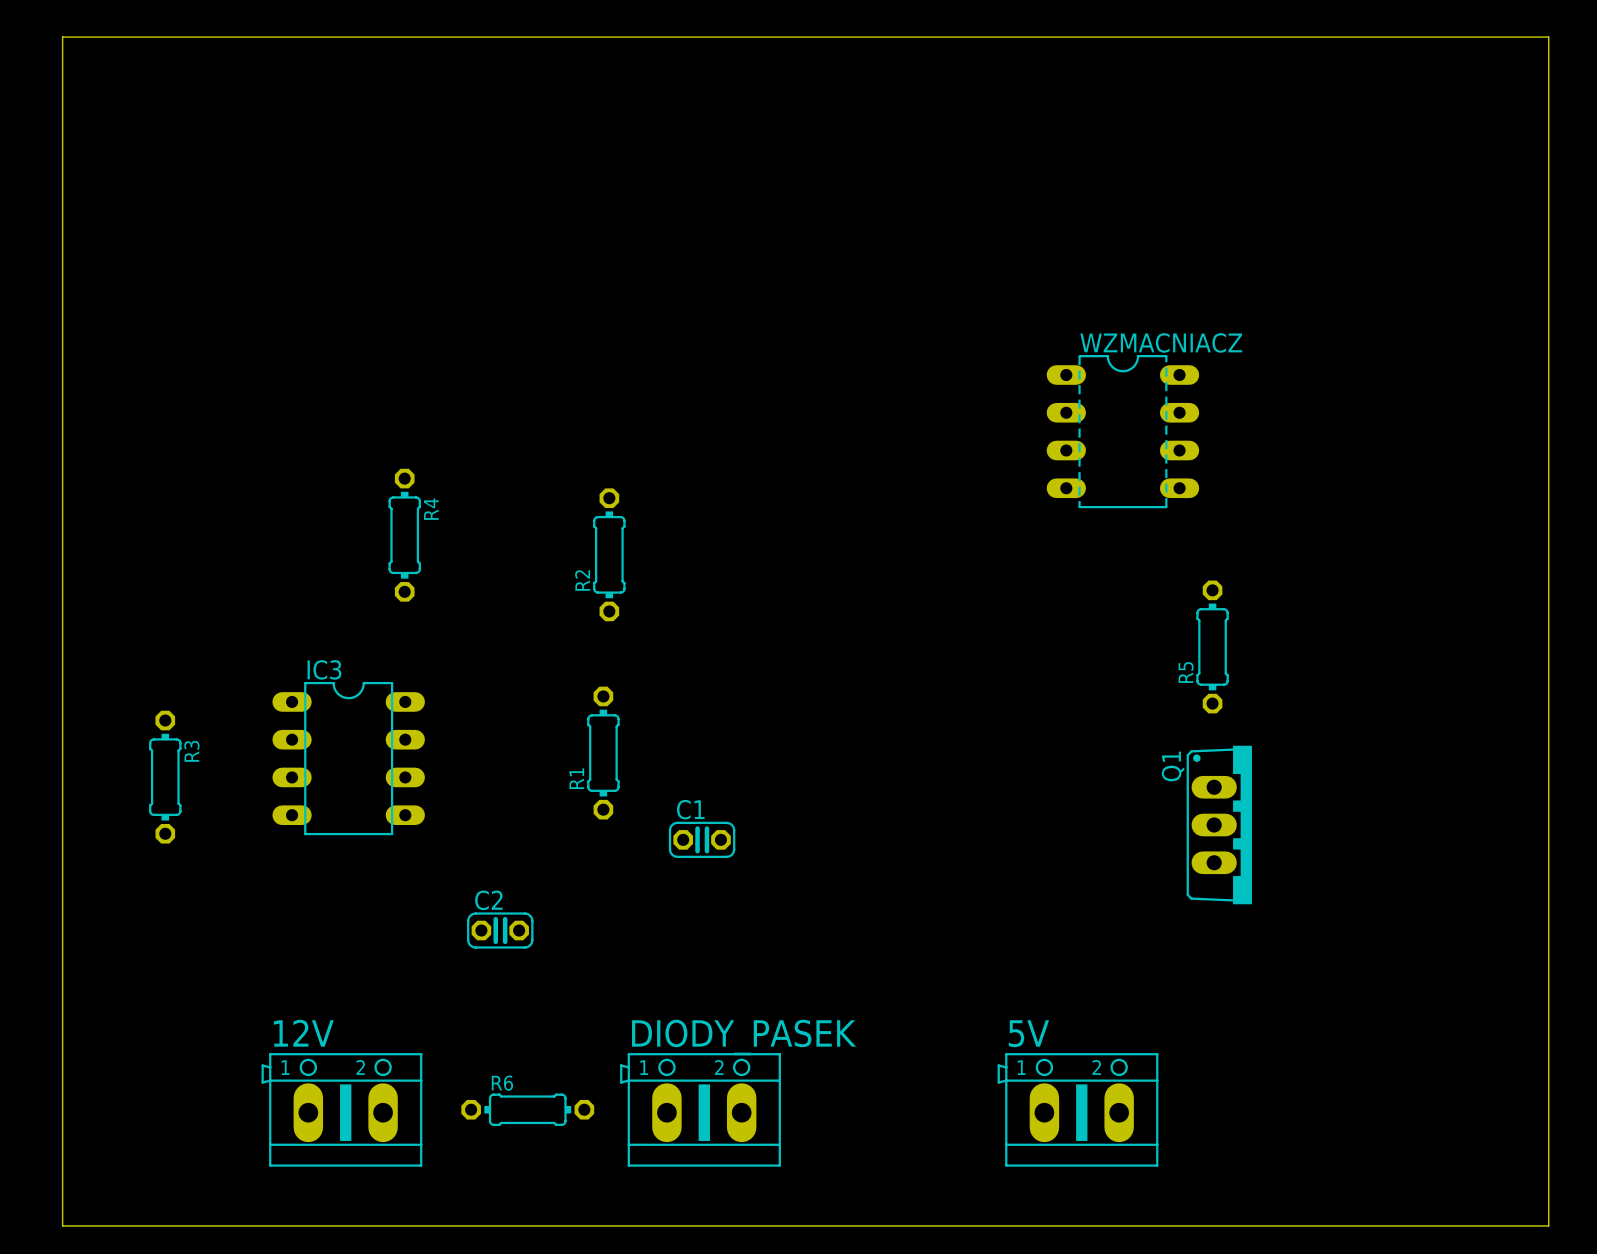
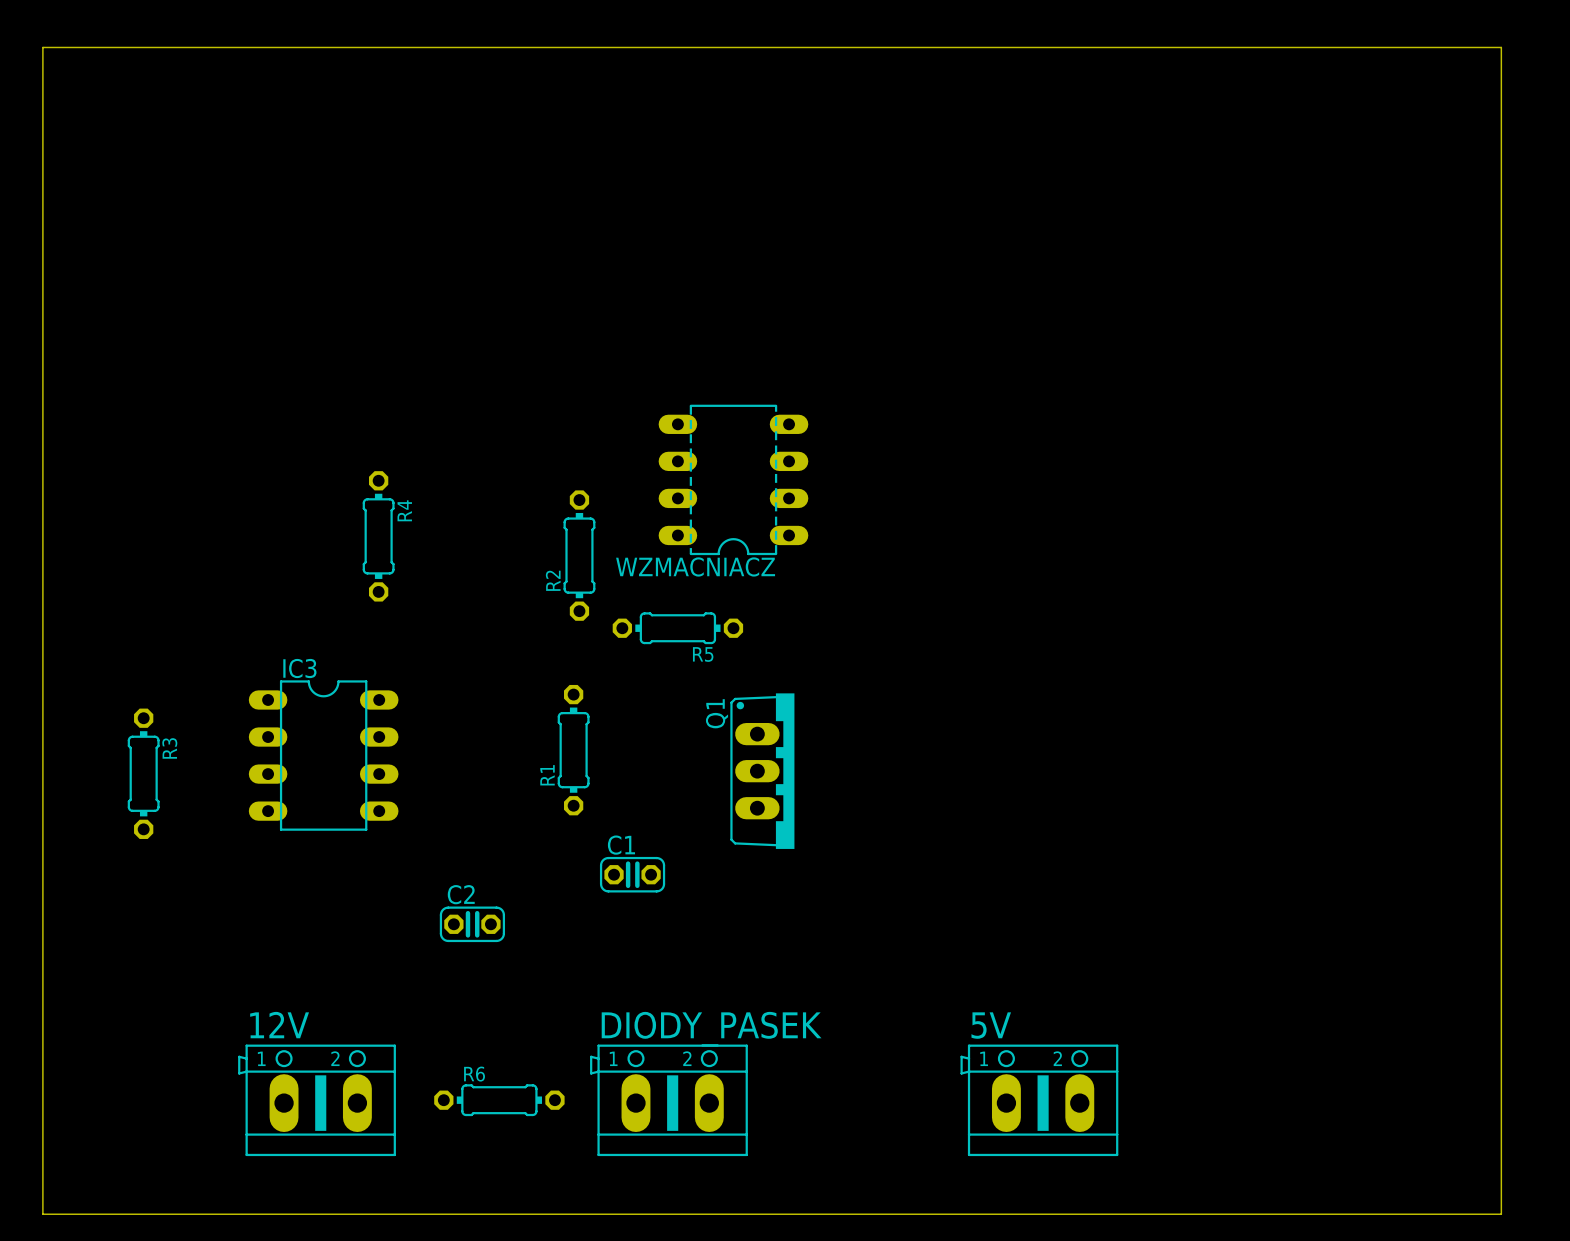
WZMACNIACZ rotation: 0° (1122, 431) -> 180° (733, 479)
WZMACNIACZ position: (1122, 431) -> (733, 479)
R5 rotation: 0° (1212, 646) -> 90° clockwise (677, 628)
R5 position: (1212, 646) -> (677, 628)
R5 name position: R5 (1186, 672) -> R5 (703, 654)
Q1 position: (1219, 825) -> (762, 771)
C1 position: (702, 839) -> (632, 874)

